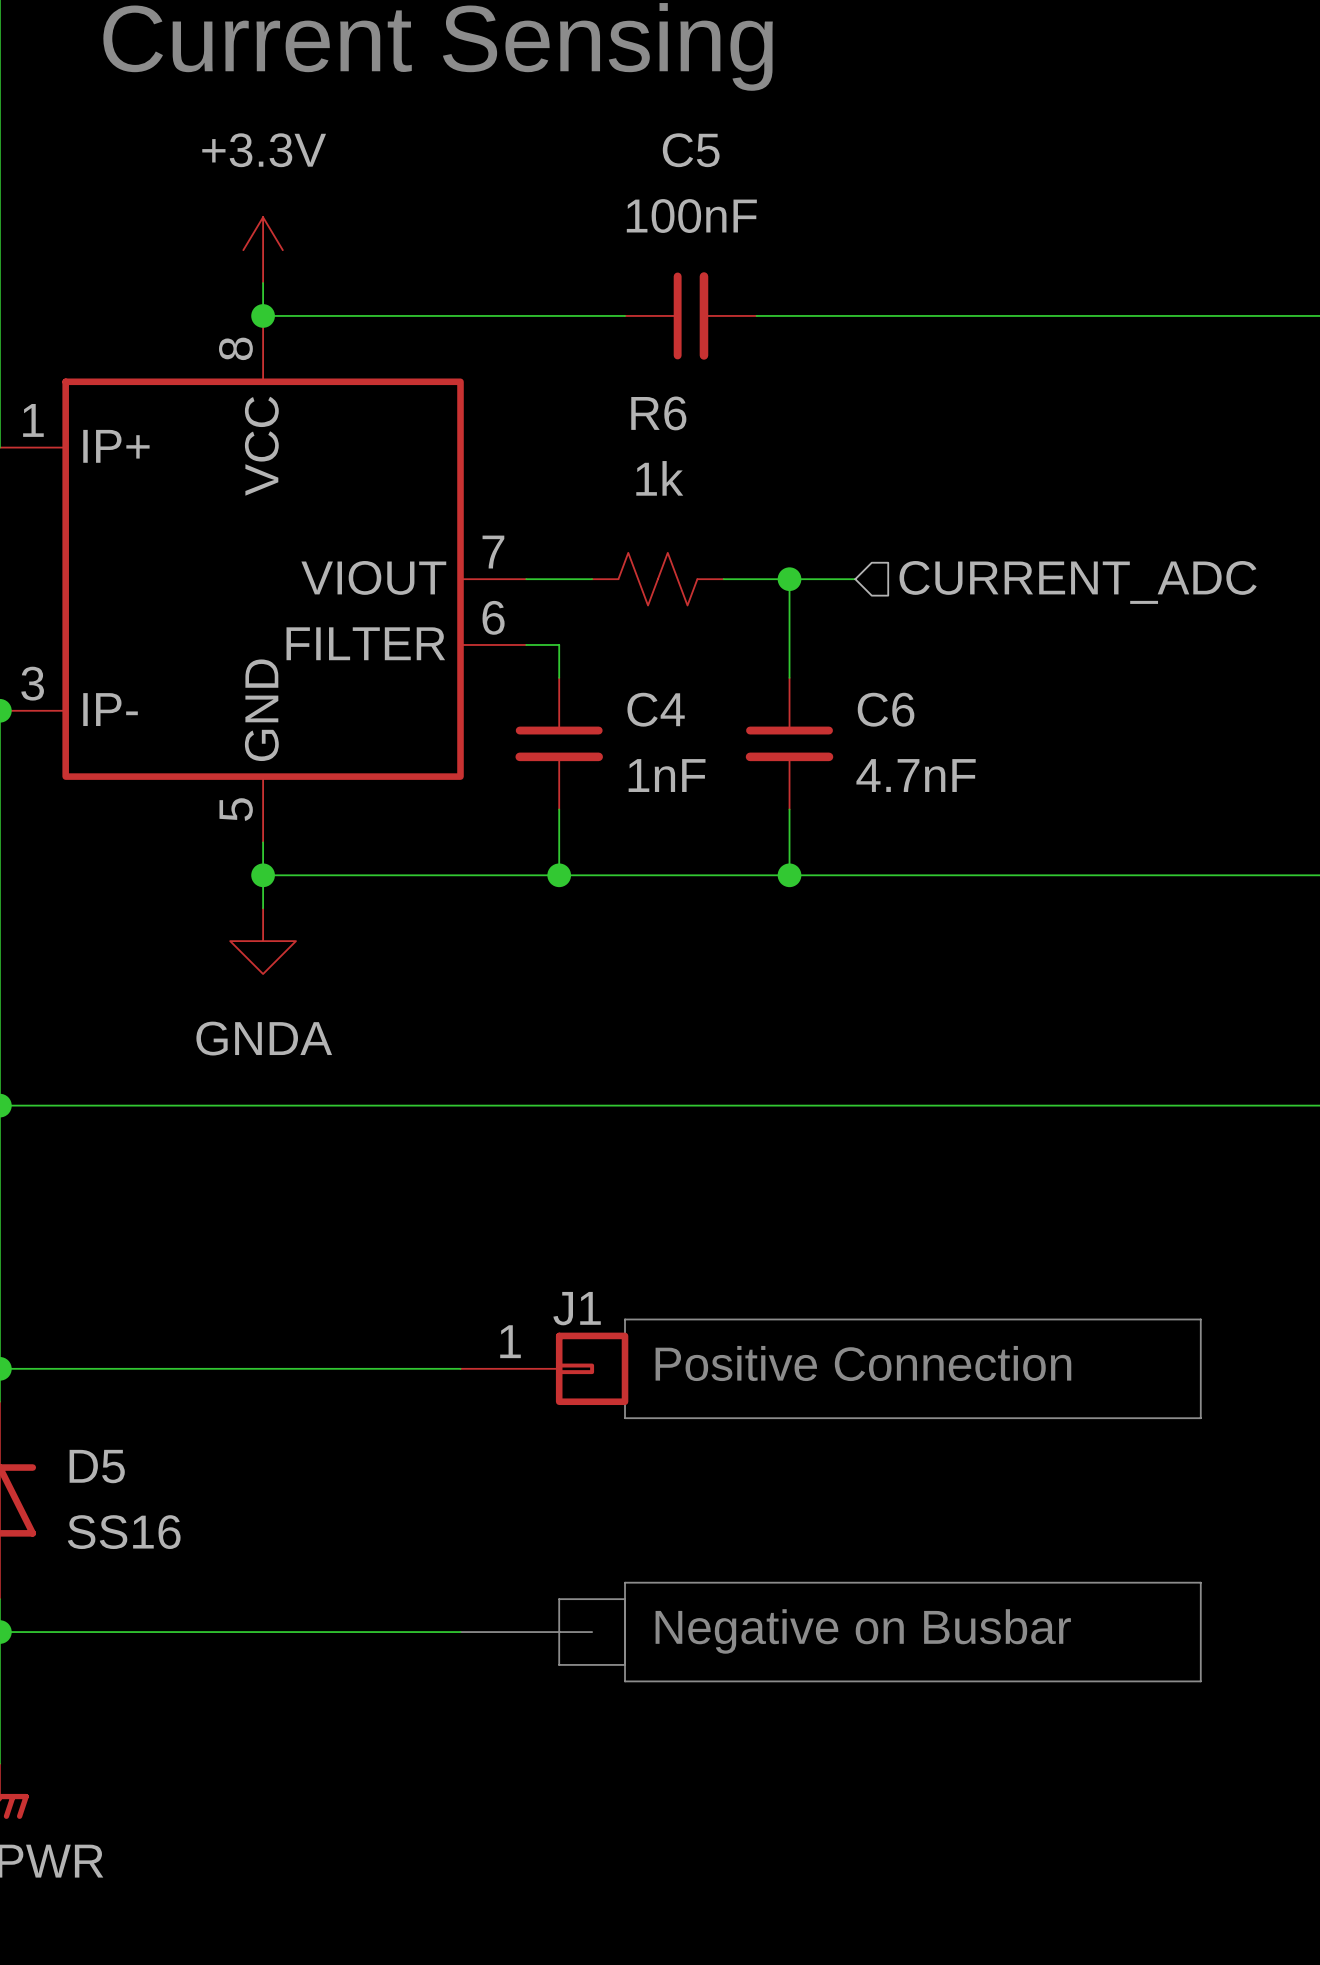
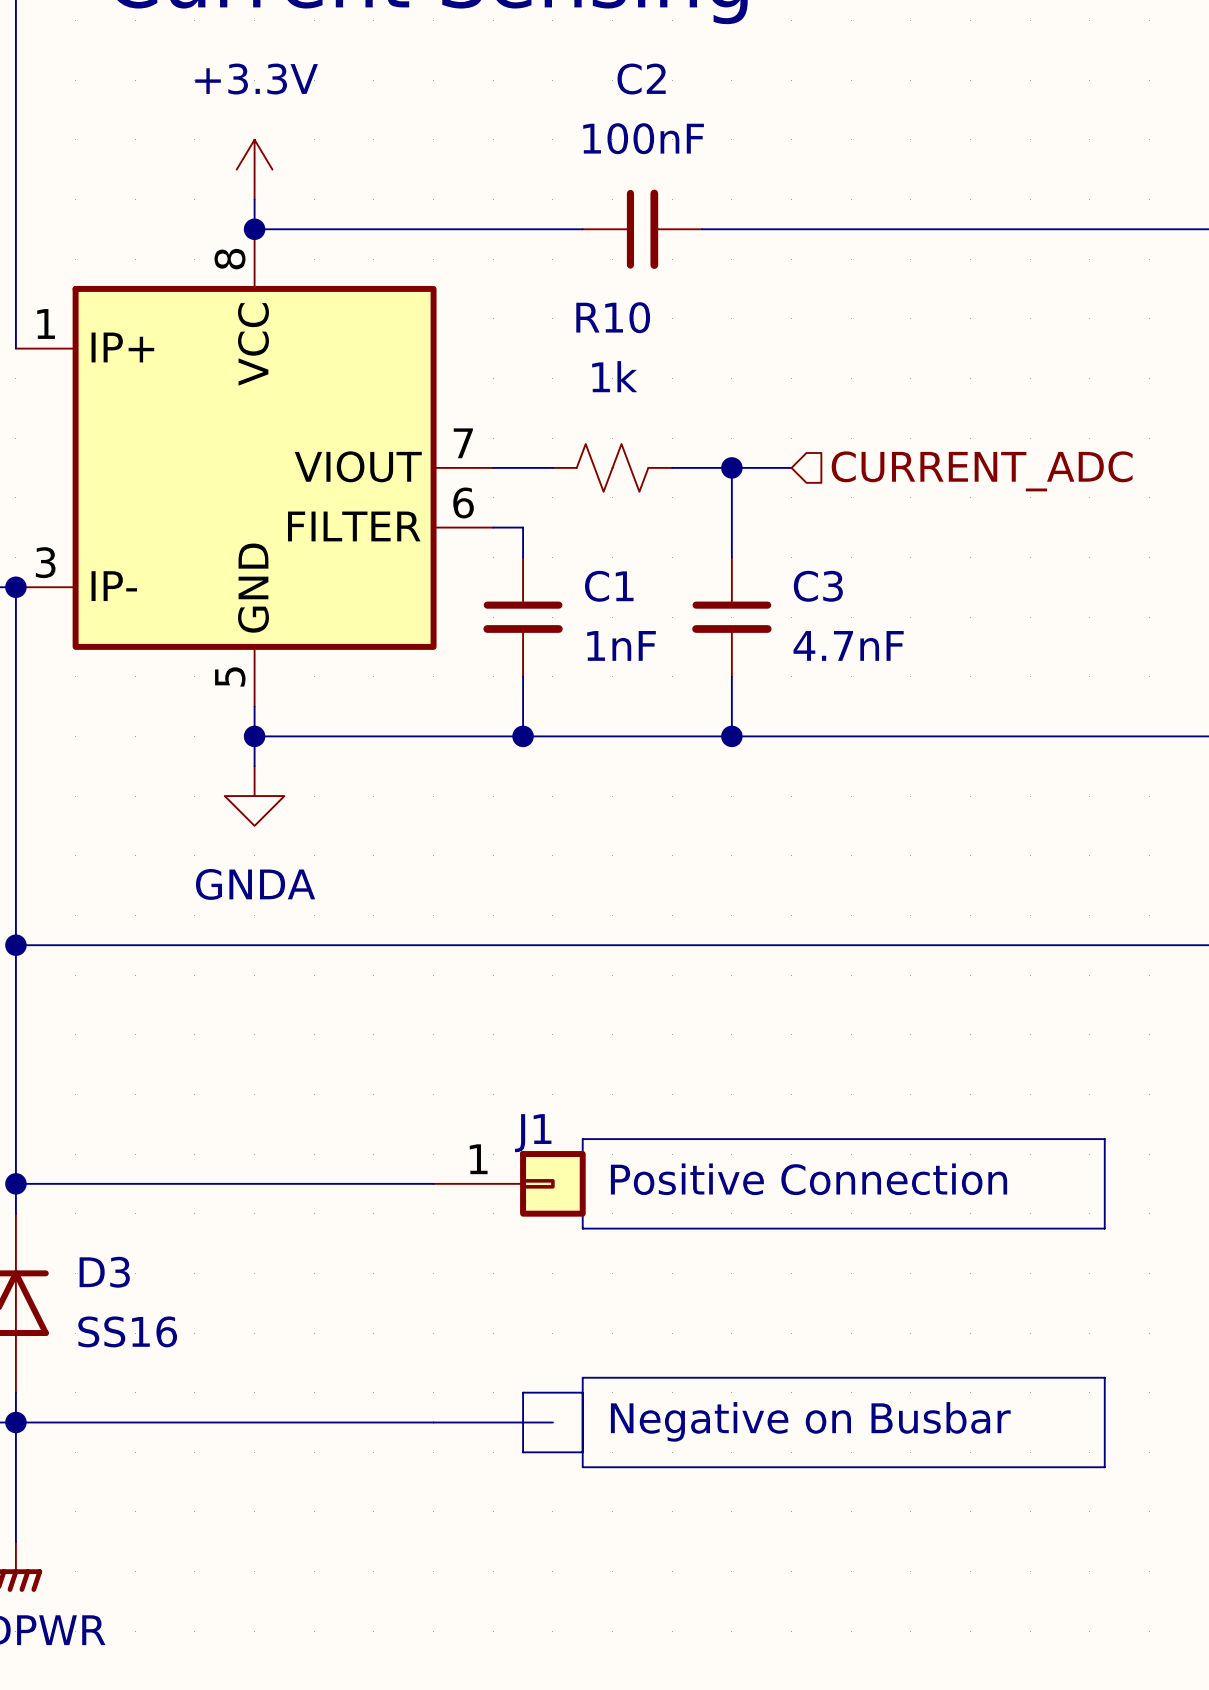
C5 name: C5 (691, 150) -> C2 (641, 79)
R6 name: R6 (658, 413) -> R10 (613, 317)
C4 name: C4 (656, 709) -> C1 (609, 586)
C6 name: C6 (886, 709) -> C3 (818, 586)
D5 name: D5 (97, 1466) -> D3 (104, 1272)

